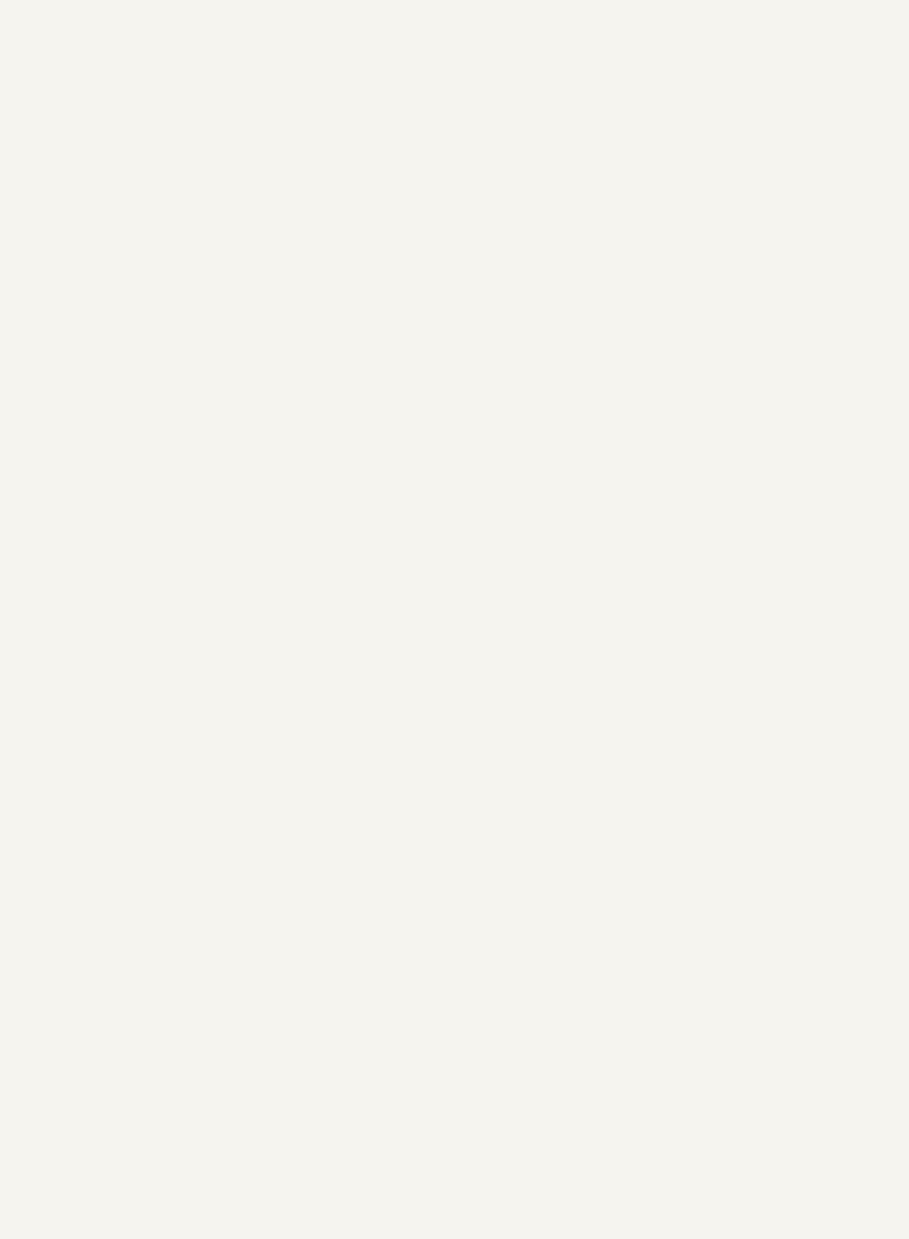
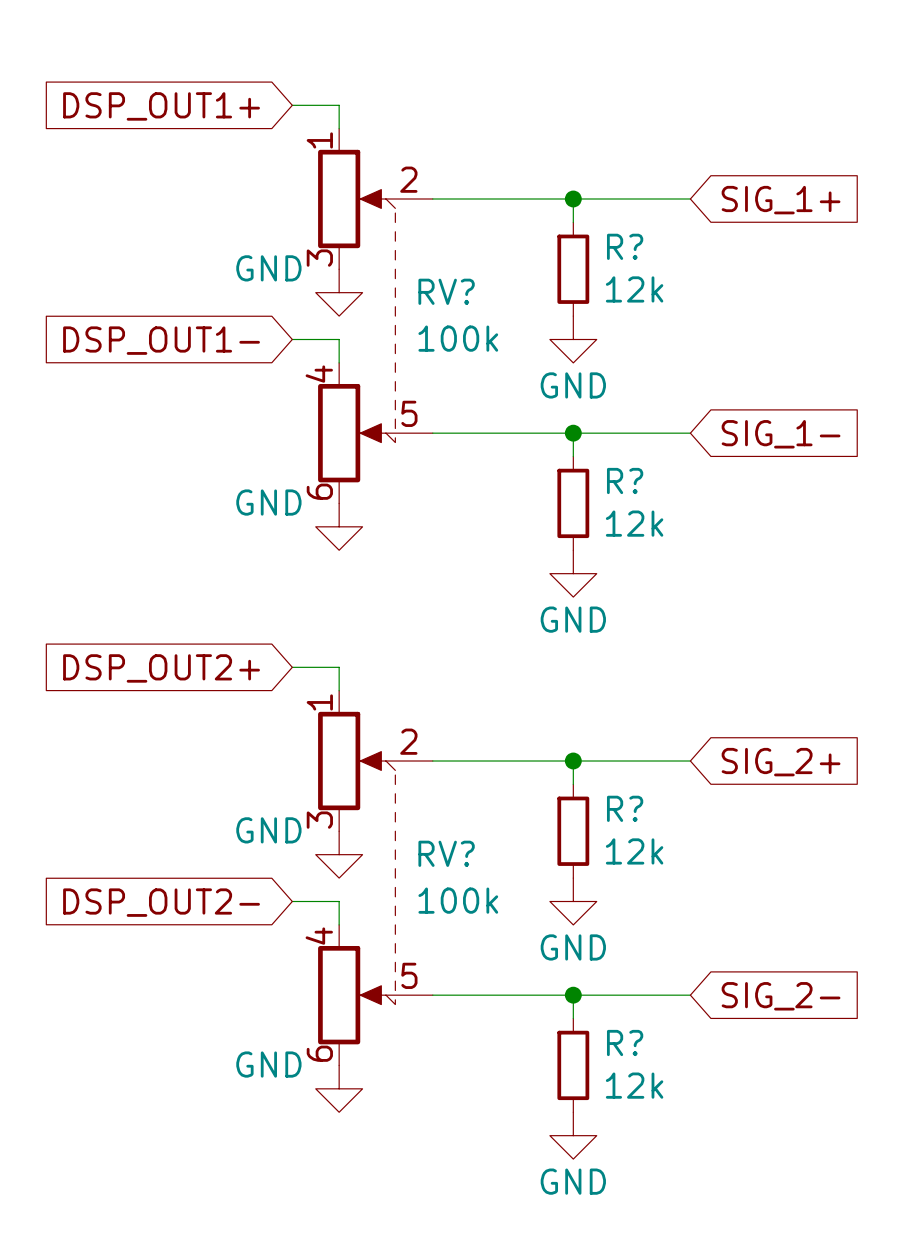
wire: none -> (292, 105) (339, 105) (339, 128)
global label: none -> DSP_OUT1+ (161, 106)
wire: none -> (432, 198) (690, 198)
wire: none -> (573, 198) (573, 222)
junction: none -> (573, 198)
global label: none -> SIG_1+ (781, 200)
R?: none -> 12k (573, 269)
power symbol: none -> GND (339, 292)
RV?: none -> 100k (375, 316)
wire: none -> (292, 339) (339, 339) (339, 362)
power symbol: none -> GND (573, 339)
global label: none -> DSP_OUT1- (161, 340)
wire: none -> (432, 433) (690, 433)
wire: none -> (573, 433) (573, 456)
junction: none -> (573, 433)
global label: none -> SIG_1- (781, 434)
R?: none -> 12k (573, 503)
power symbol: none -> GND (339, 526)
power symbol: none -> GND (573, 573)
wire: none -> (292, 667) (339, 667) (339, 690)
global label: none -> DSP_OUT2+ (161, 668)
wire: none -> (432, 761) (690, 761)
wire: none -> (573, 761) (573, 784)
junction: none -> (573, 761)
global label: none -> SIG_2+ (781, 762)
R?: none -> 12k (573, 831)
power symbol: none -> GND (339, 854)
RV?: none -> 100k (375, 878)
wire: none -> (292, 901) (339, 901) (339, 924)
power symbol: none -> GND (573, 901)
global label: none -> DSP_OUT2- (161, 902)
wire: none -> (432, 995) (690, 995)
wire: none -> (573, 995) (573, 1018)
junction: none -> (573, 995)
global label: none -> SIG_2- (781, 996)
R?: none -> 12k (573, 1065)
power symbol: none -> GND (339, 1088)
power symbol: none -> GND (573, 1135)

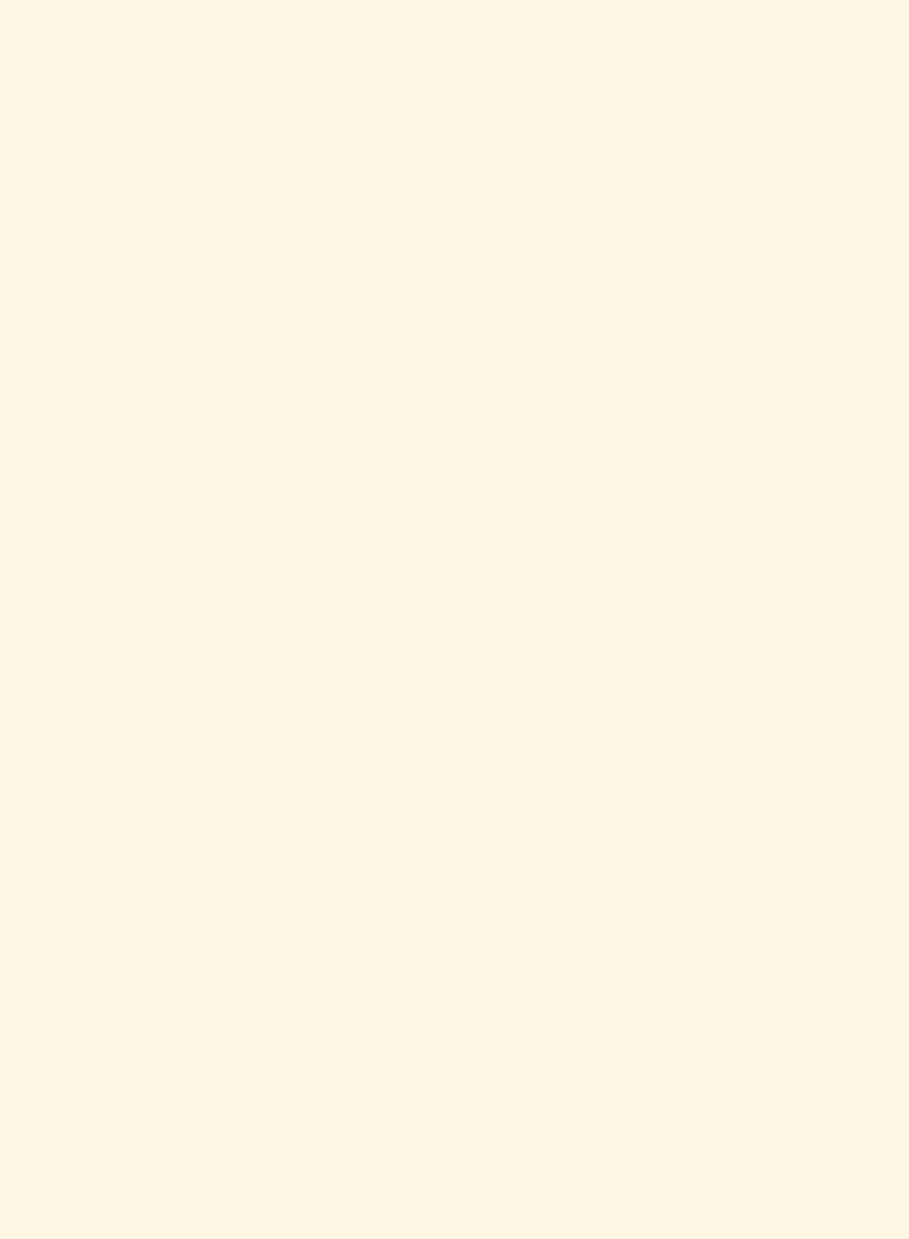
wire: (292, 105) (339, 105) (339, 128) -> none
global label: DSP_OUT1+ (161, 106) -> none
wire: (432, 198) (690, 198) -> none
wire: (573, 198) (573, 222) -> none
junction: (573, 198) -> none
global label: SIG_1+ (781, 200) -> none
R?: 12k (573, 269) -> none
power symbol: GND (339, 292) -> none
RV?: 100k (375, 316) -> none
wire: (292, 339) (339, 339) (339, 362) -> none
power symbol: GND (573, 339) -> none
global label: DSP_OUT1- (161, 340) -> none
wire: (432, 433) (690, 433) -> none
wire: (573, 433) (573, 456) -> none
junction: (573, 433) -> none
global label: SIG_1- (781, 434) -> none
R?: 12k (573, 503) -> none
power symbol: GND (339, 526) -> none
power symbol: GND (573, 573) -> none
wire: (292, 667) (339, 667) (339, 690) -> none
global label: DSP_OUT2+ (161, 668) -> none
wire: (432, 761) (690, 761) -> none
wire: (573, 761) (573, 784) -> none
junction: (573, 761) -> none
global label: SIG_2+ (781, 762) -> none
R?: 12k (573, 831) -> none
power symbol: GND (339, 854) -> none
RV?: 100k (375, 878) -> none
wire: (292, 901) (339, 901) (339, 924) -> none
power symbol: GND (573, 901) -> none
global label: DSP_OUT2- (161, 902) -> none
wire: (432, 995) (690, 995) -> none
wire: (573, 995) (573, 1018) -> none
junction: (573, 995) -> none
global label: SIG_2- (781, 996) -> none
R?: 12k (573, 1065) -> none
power symbol: GND (339, 1088) -> none
power symbol: GND (573, 1135) -> none

